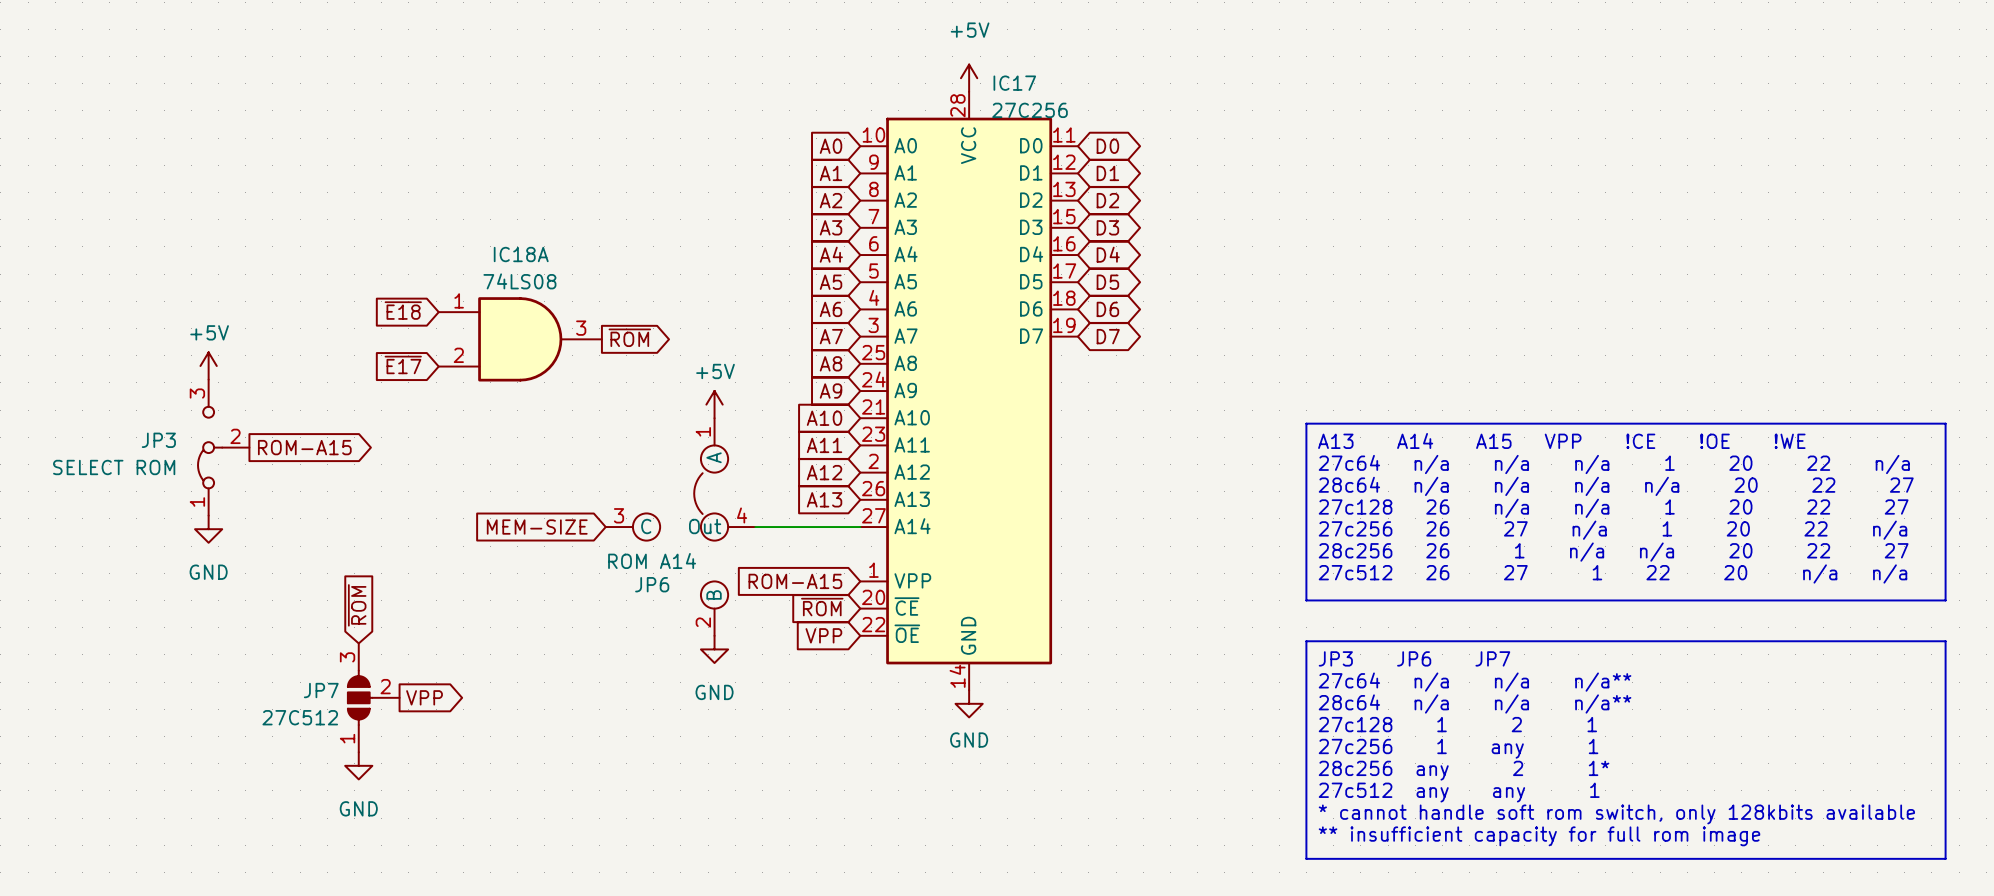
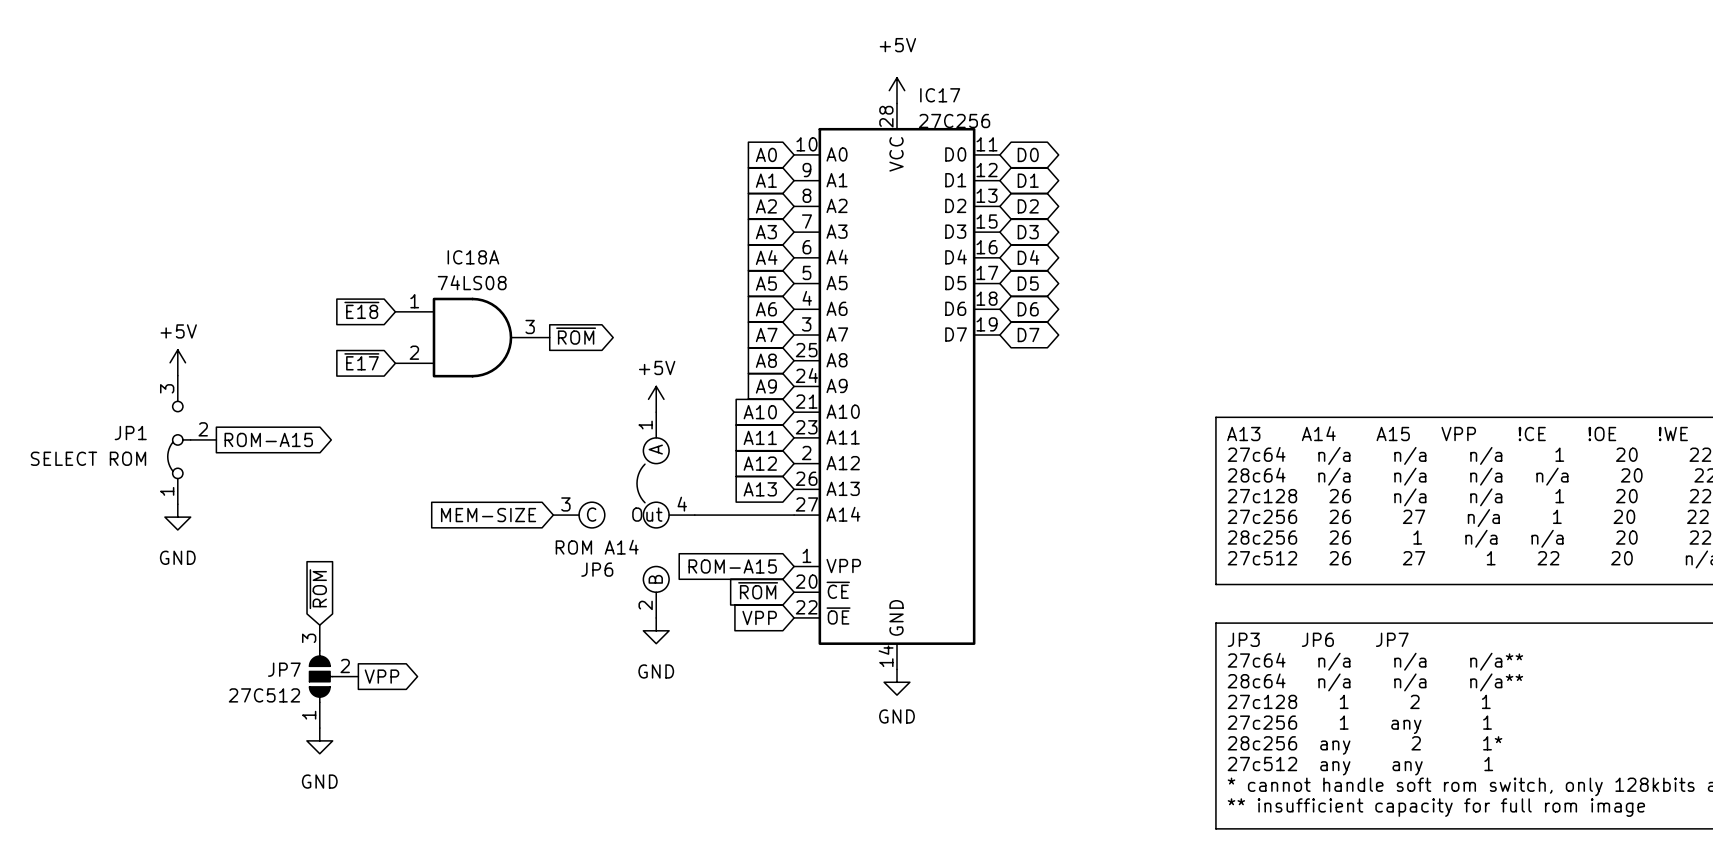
JP3 name: JP3 (158, 440) -> JP1 (130, 433)

